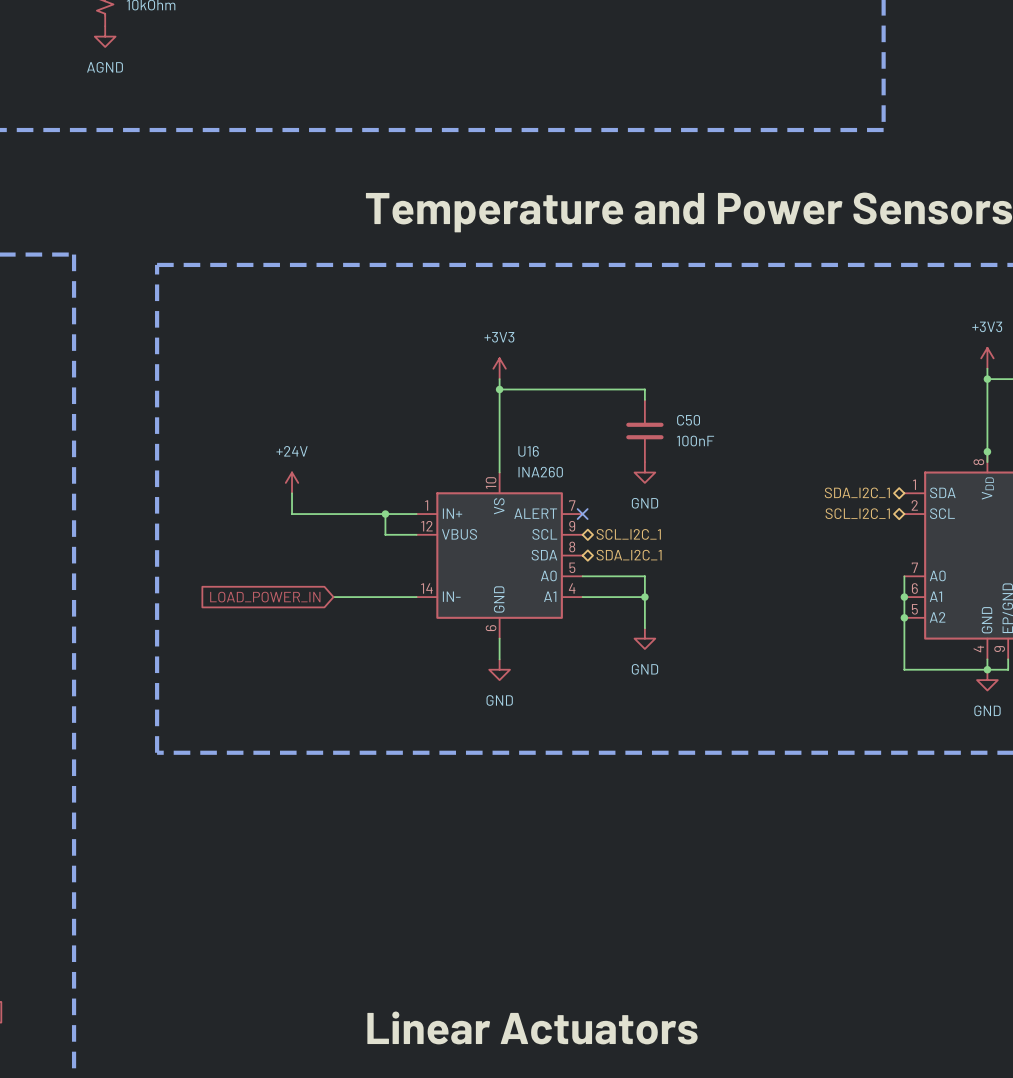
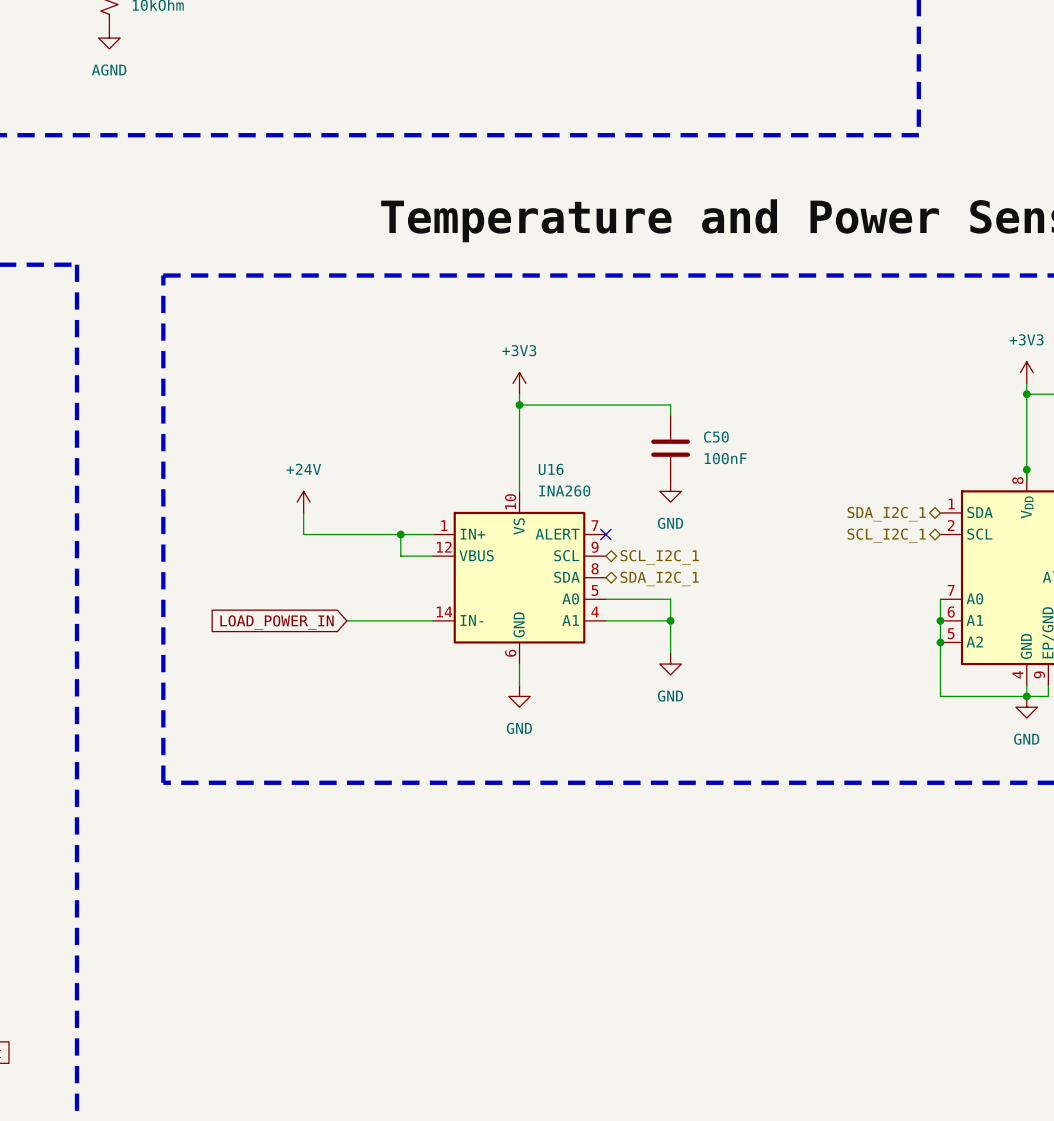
label: Linear Actuators (532, 1027) -> none

